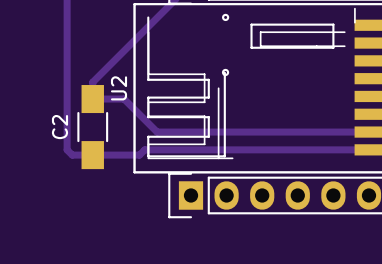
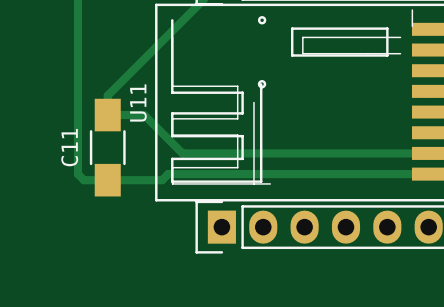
U2 name: U2 (119, 88) -> U11 (138, 103)
C2 name: C2 (59, 127) -> C11 (69, 147)

